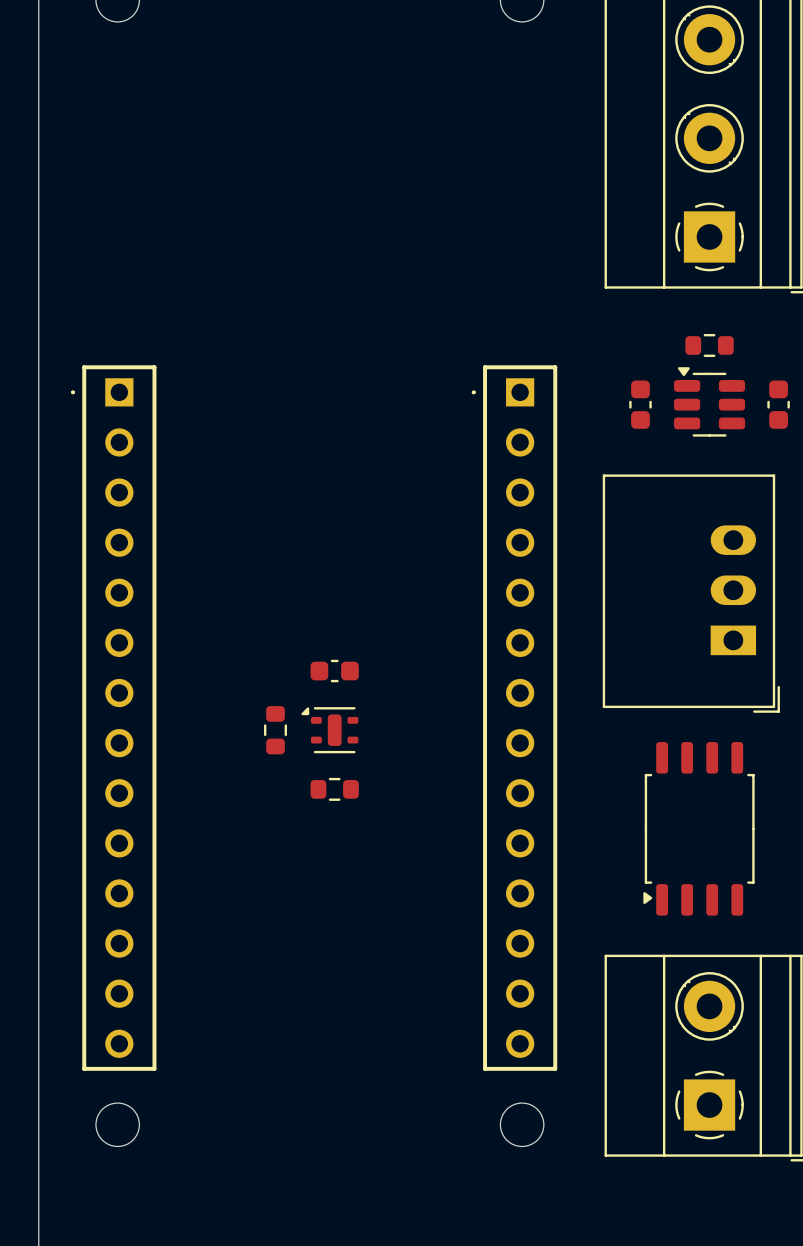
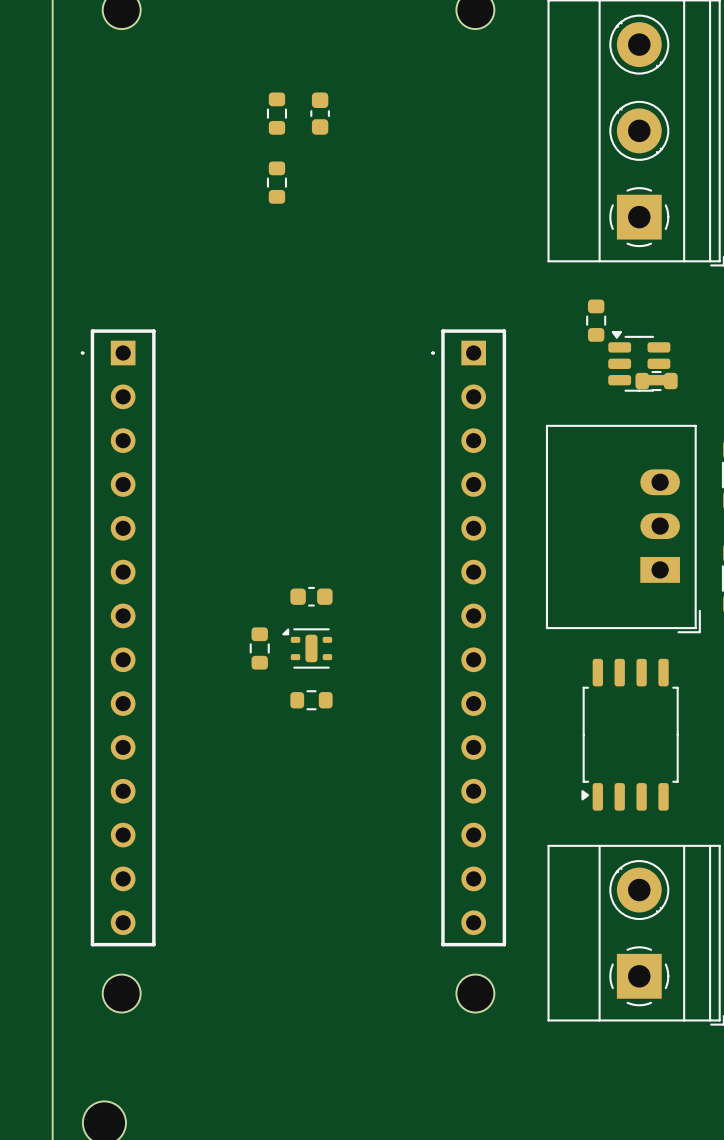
part: none -> (276, 113)
part: none -> (320, 113)
part: none -> (276, 182)
part: (709, 345) -> none
part: none -> (596, 320)
part: (640, 404) -> none
part: (778, 404) -> none
part: none -> (656, 381)

